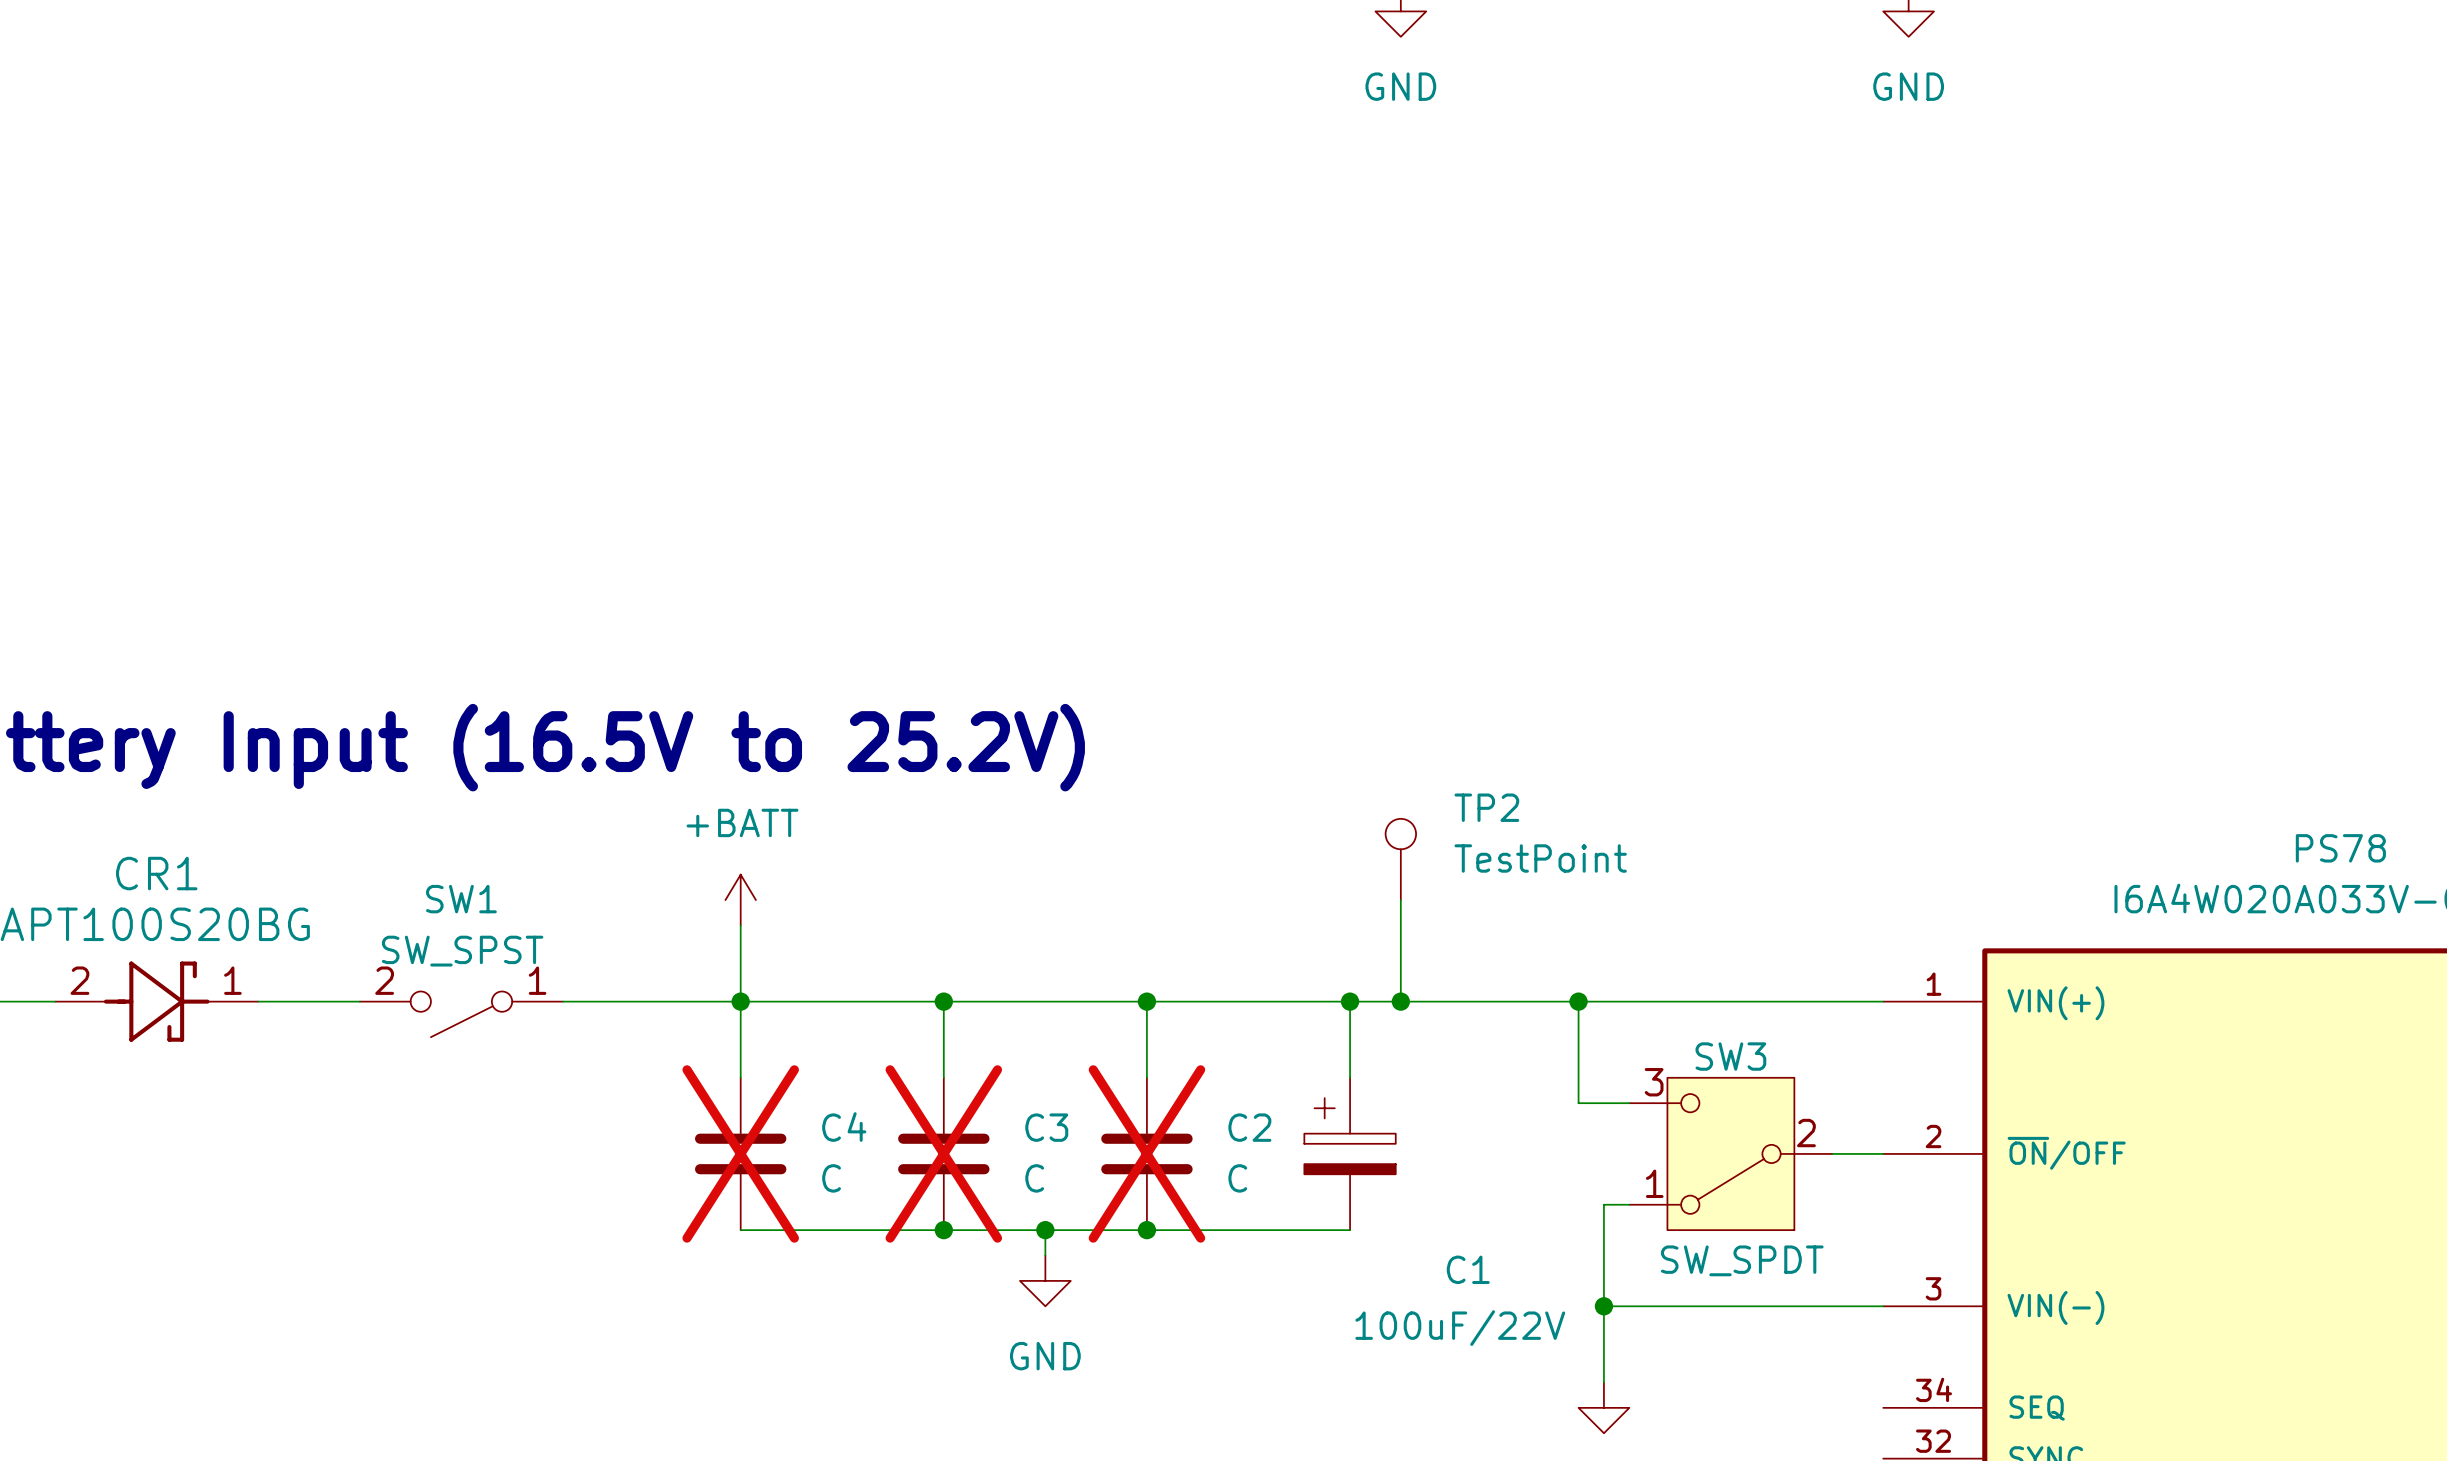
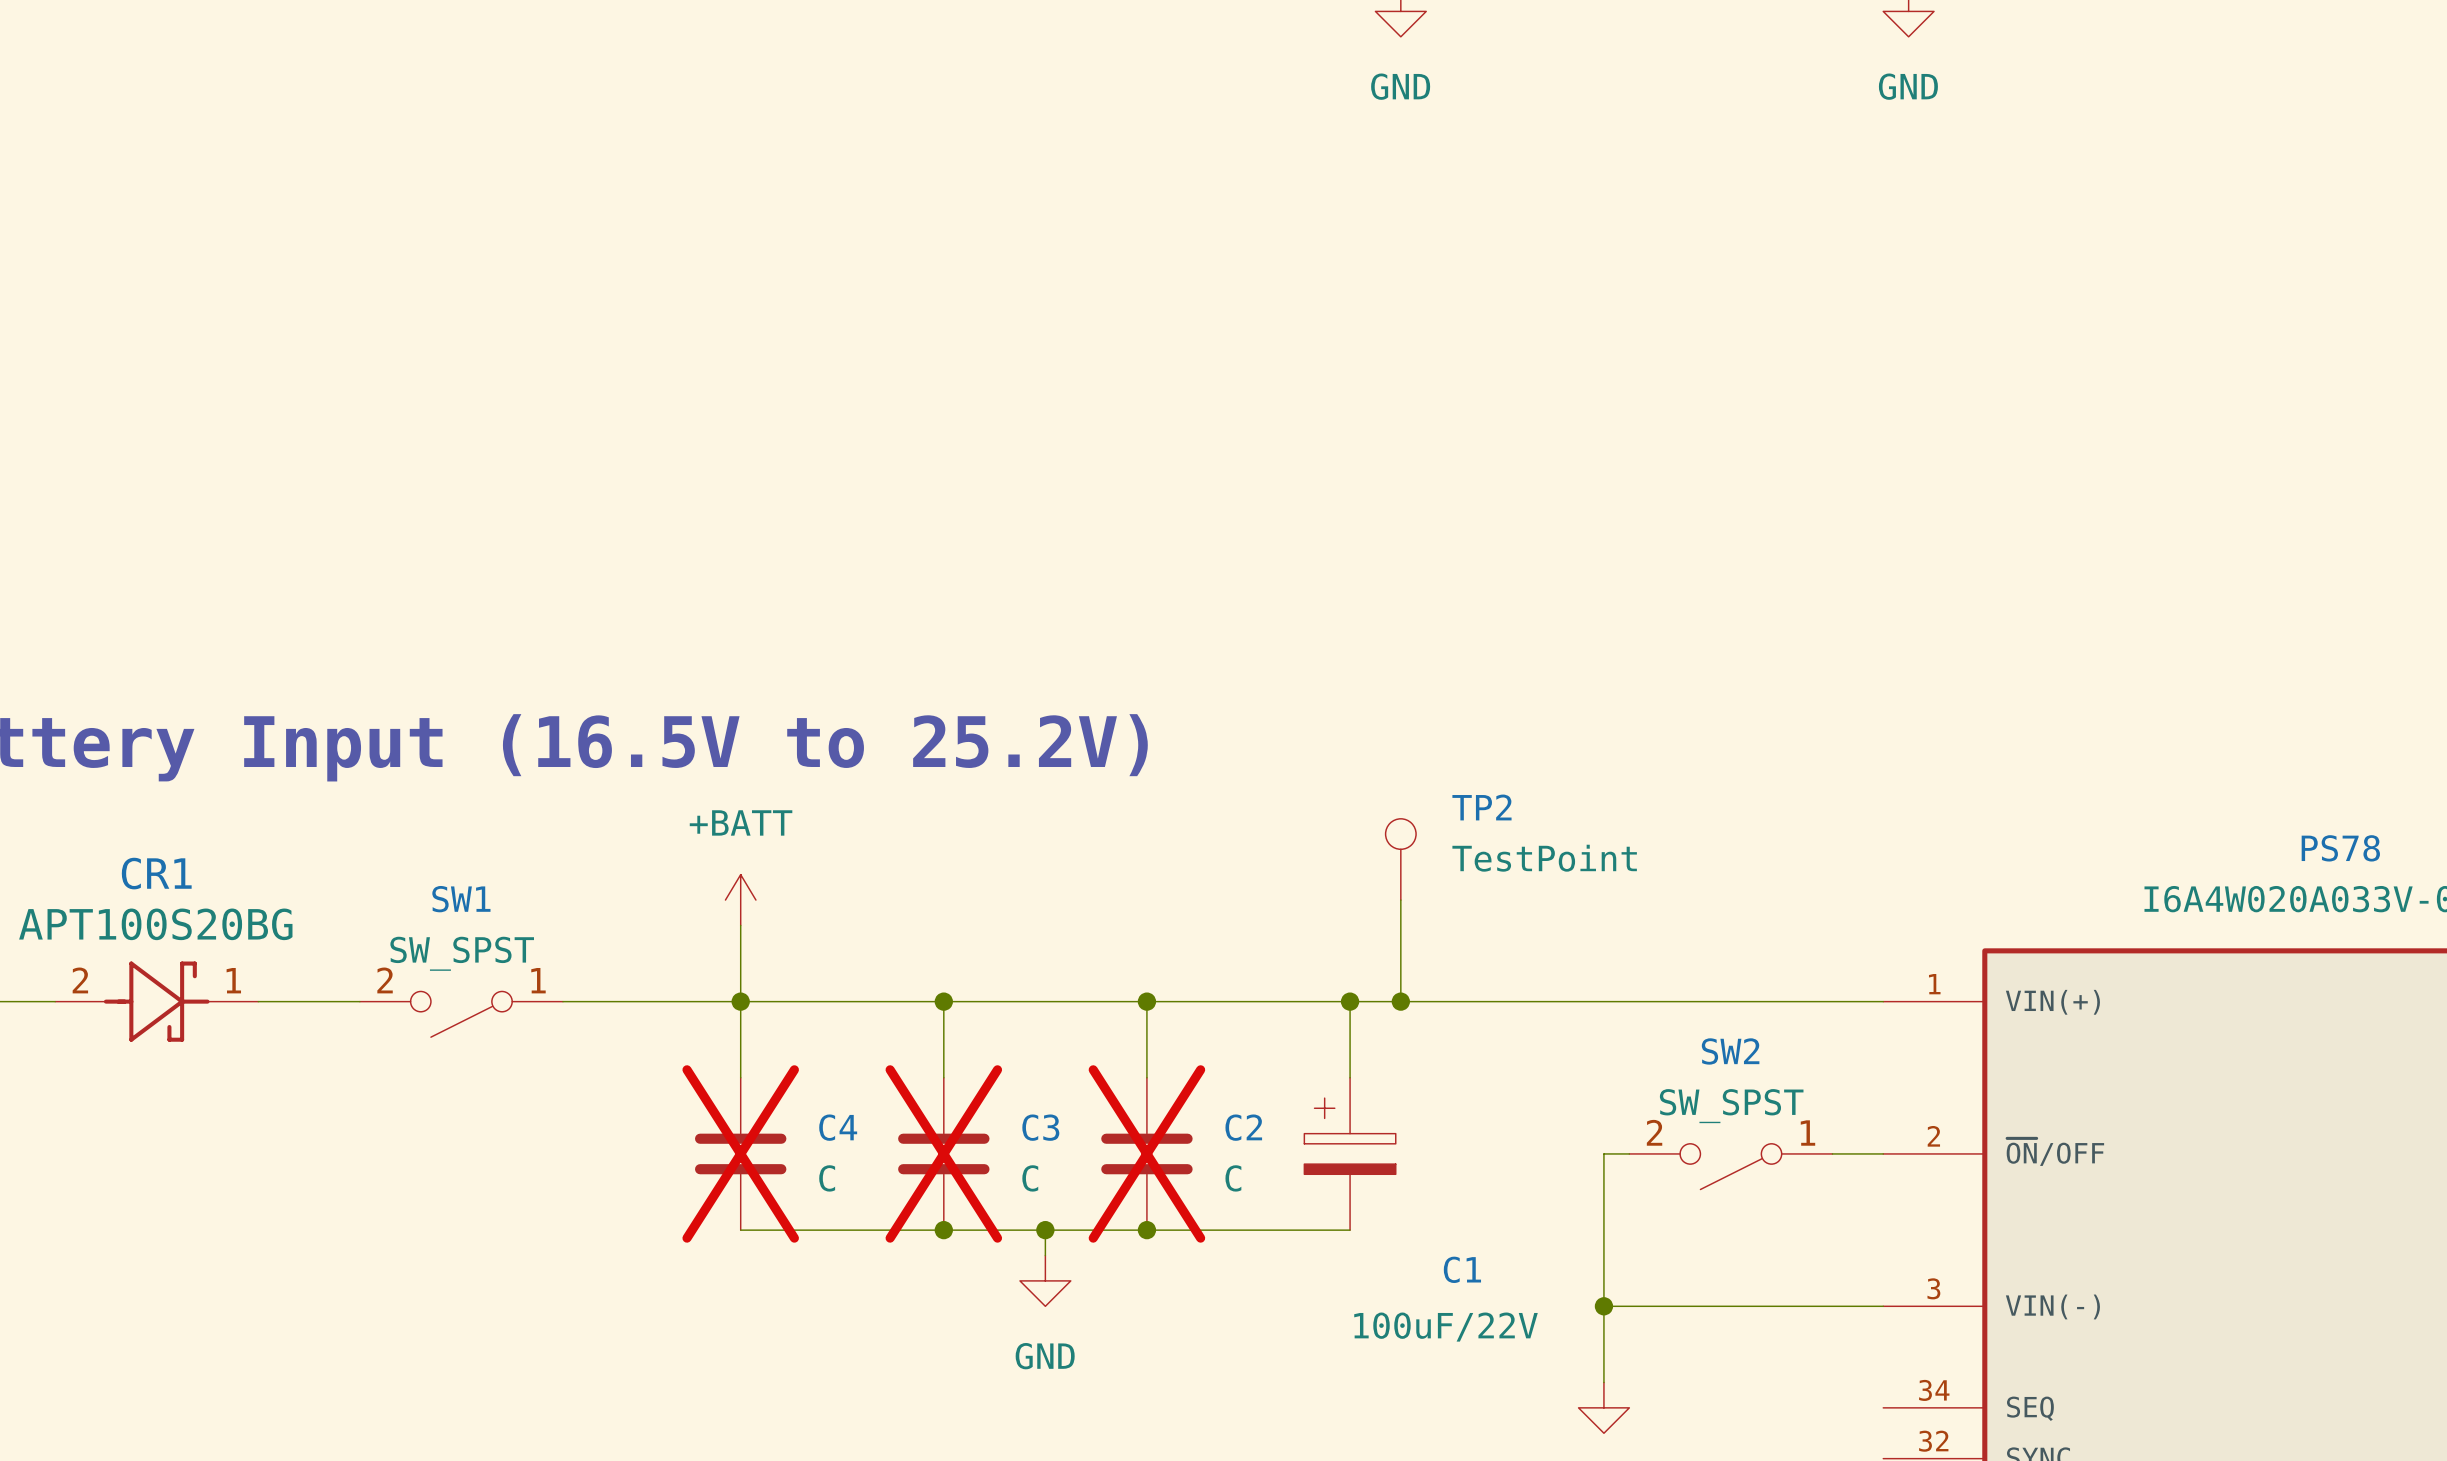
wire: (1578, 1001) (1578, 1103) (1629, 1103) -> none
junction: (1578, 1001) -> none
SW3: SW_SPDT (1730, 1153) -> none
SW2: none -> SW_SPST (1730, 1166)
wire: (1603, 1204) (1629, 1204) -> (1603, 1204) (1603, 1153) (1629, 1153)

